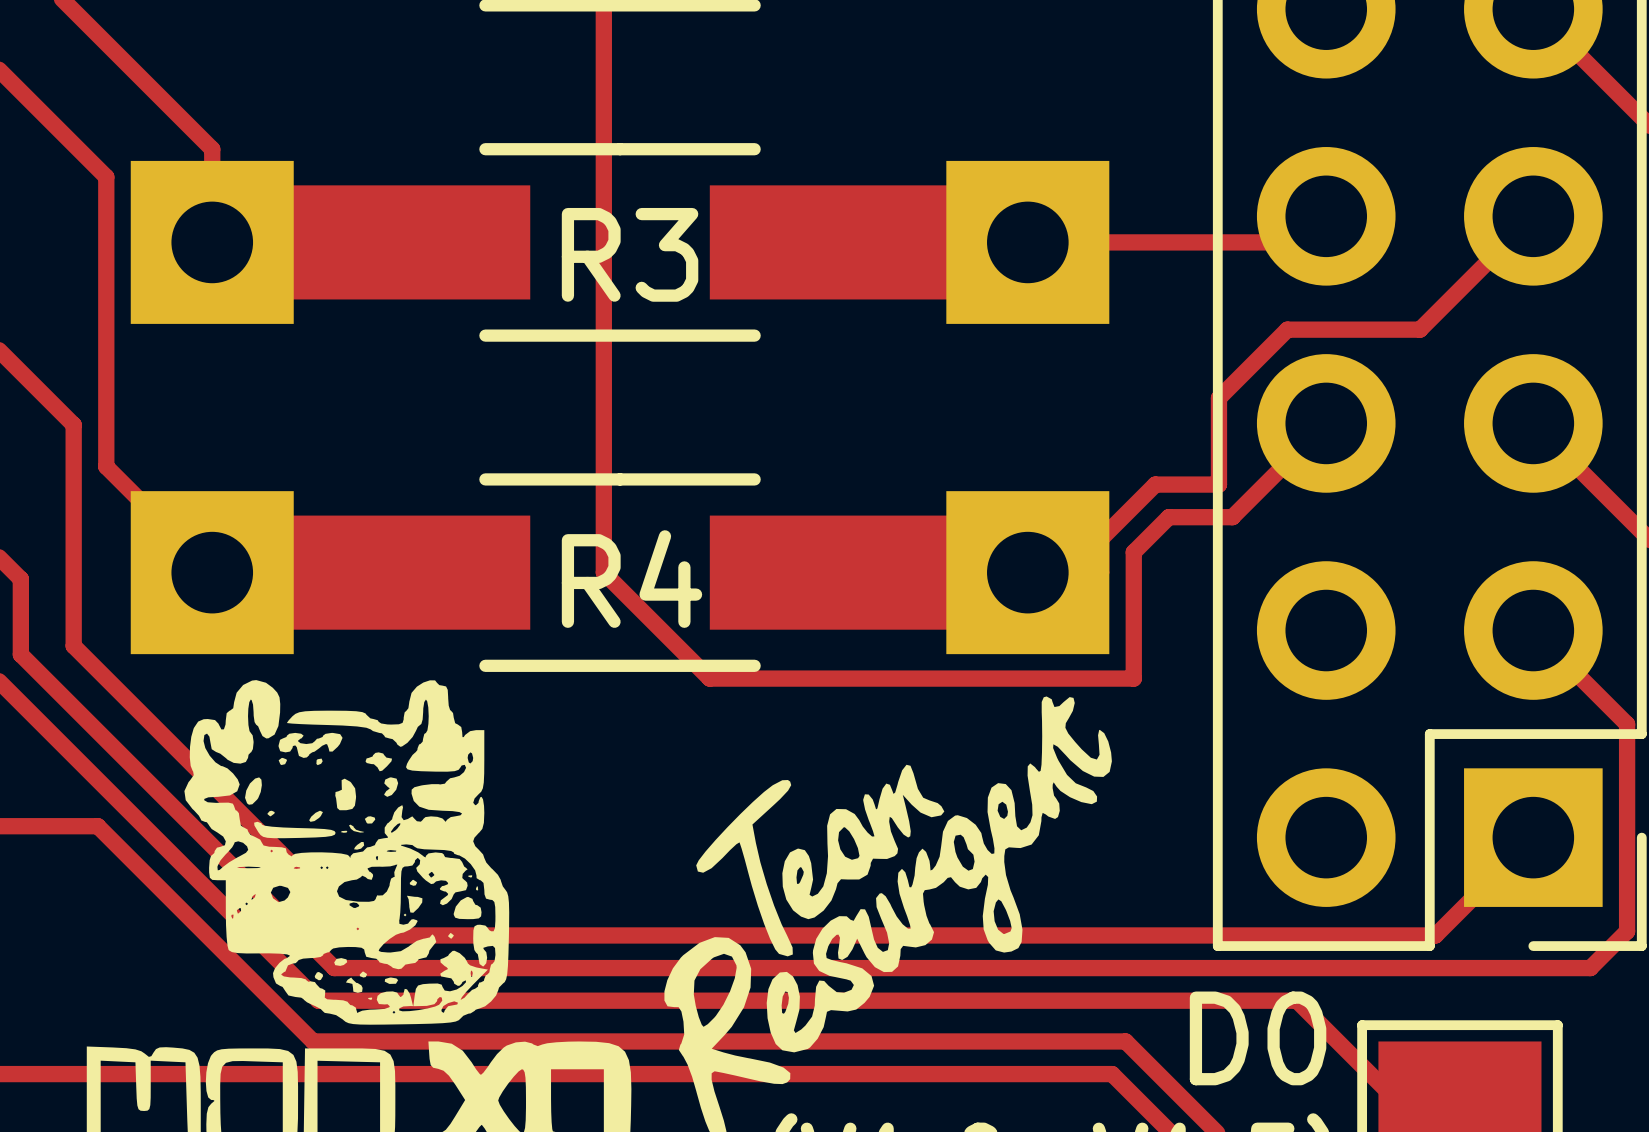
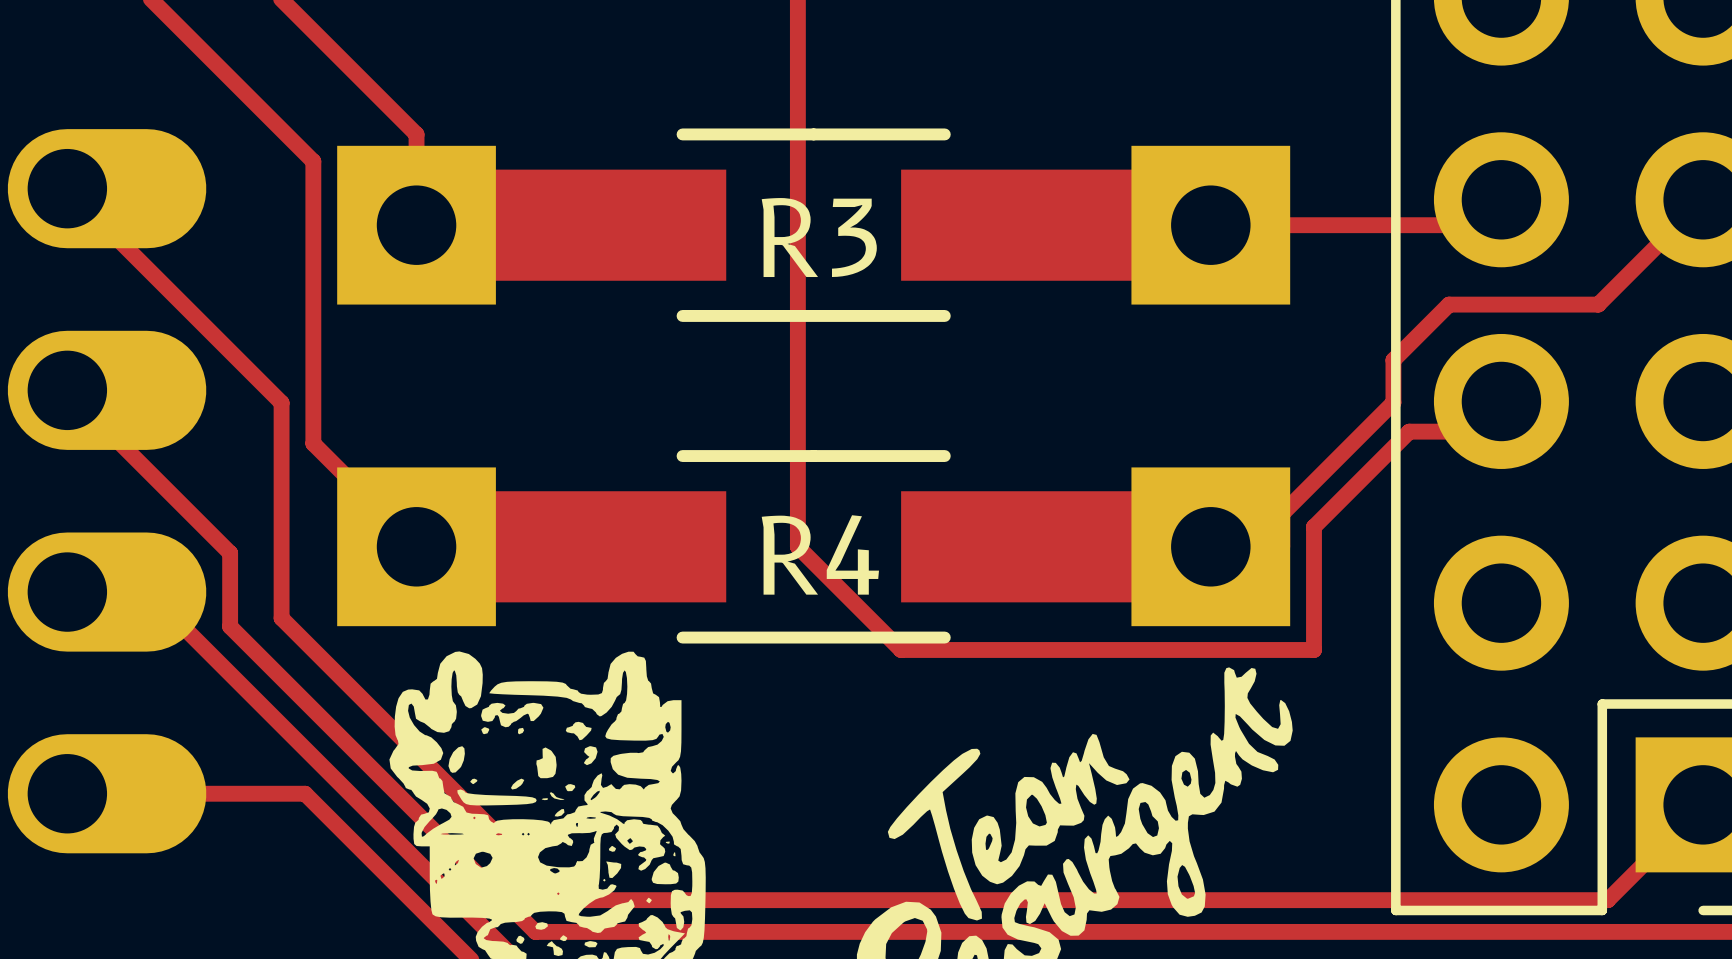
track: (1425, 323) (1420, 329) (1287, 329) (1218, 398) (1218, 484) (1155, 484) -> (1598, 304) (1449, 304) (1393, 360) (1393, 402) (1335, 461)
track: (1295, 454) (1232, 517) (1168, 517) -> (1471, 431) (1409, 431) (1348, 492)

